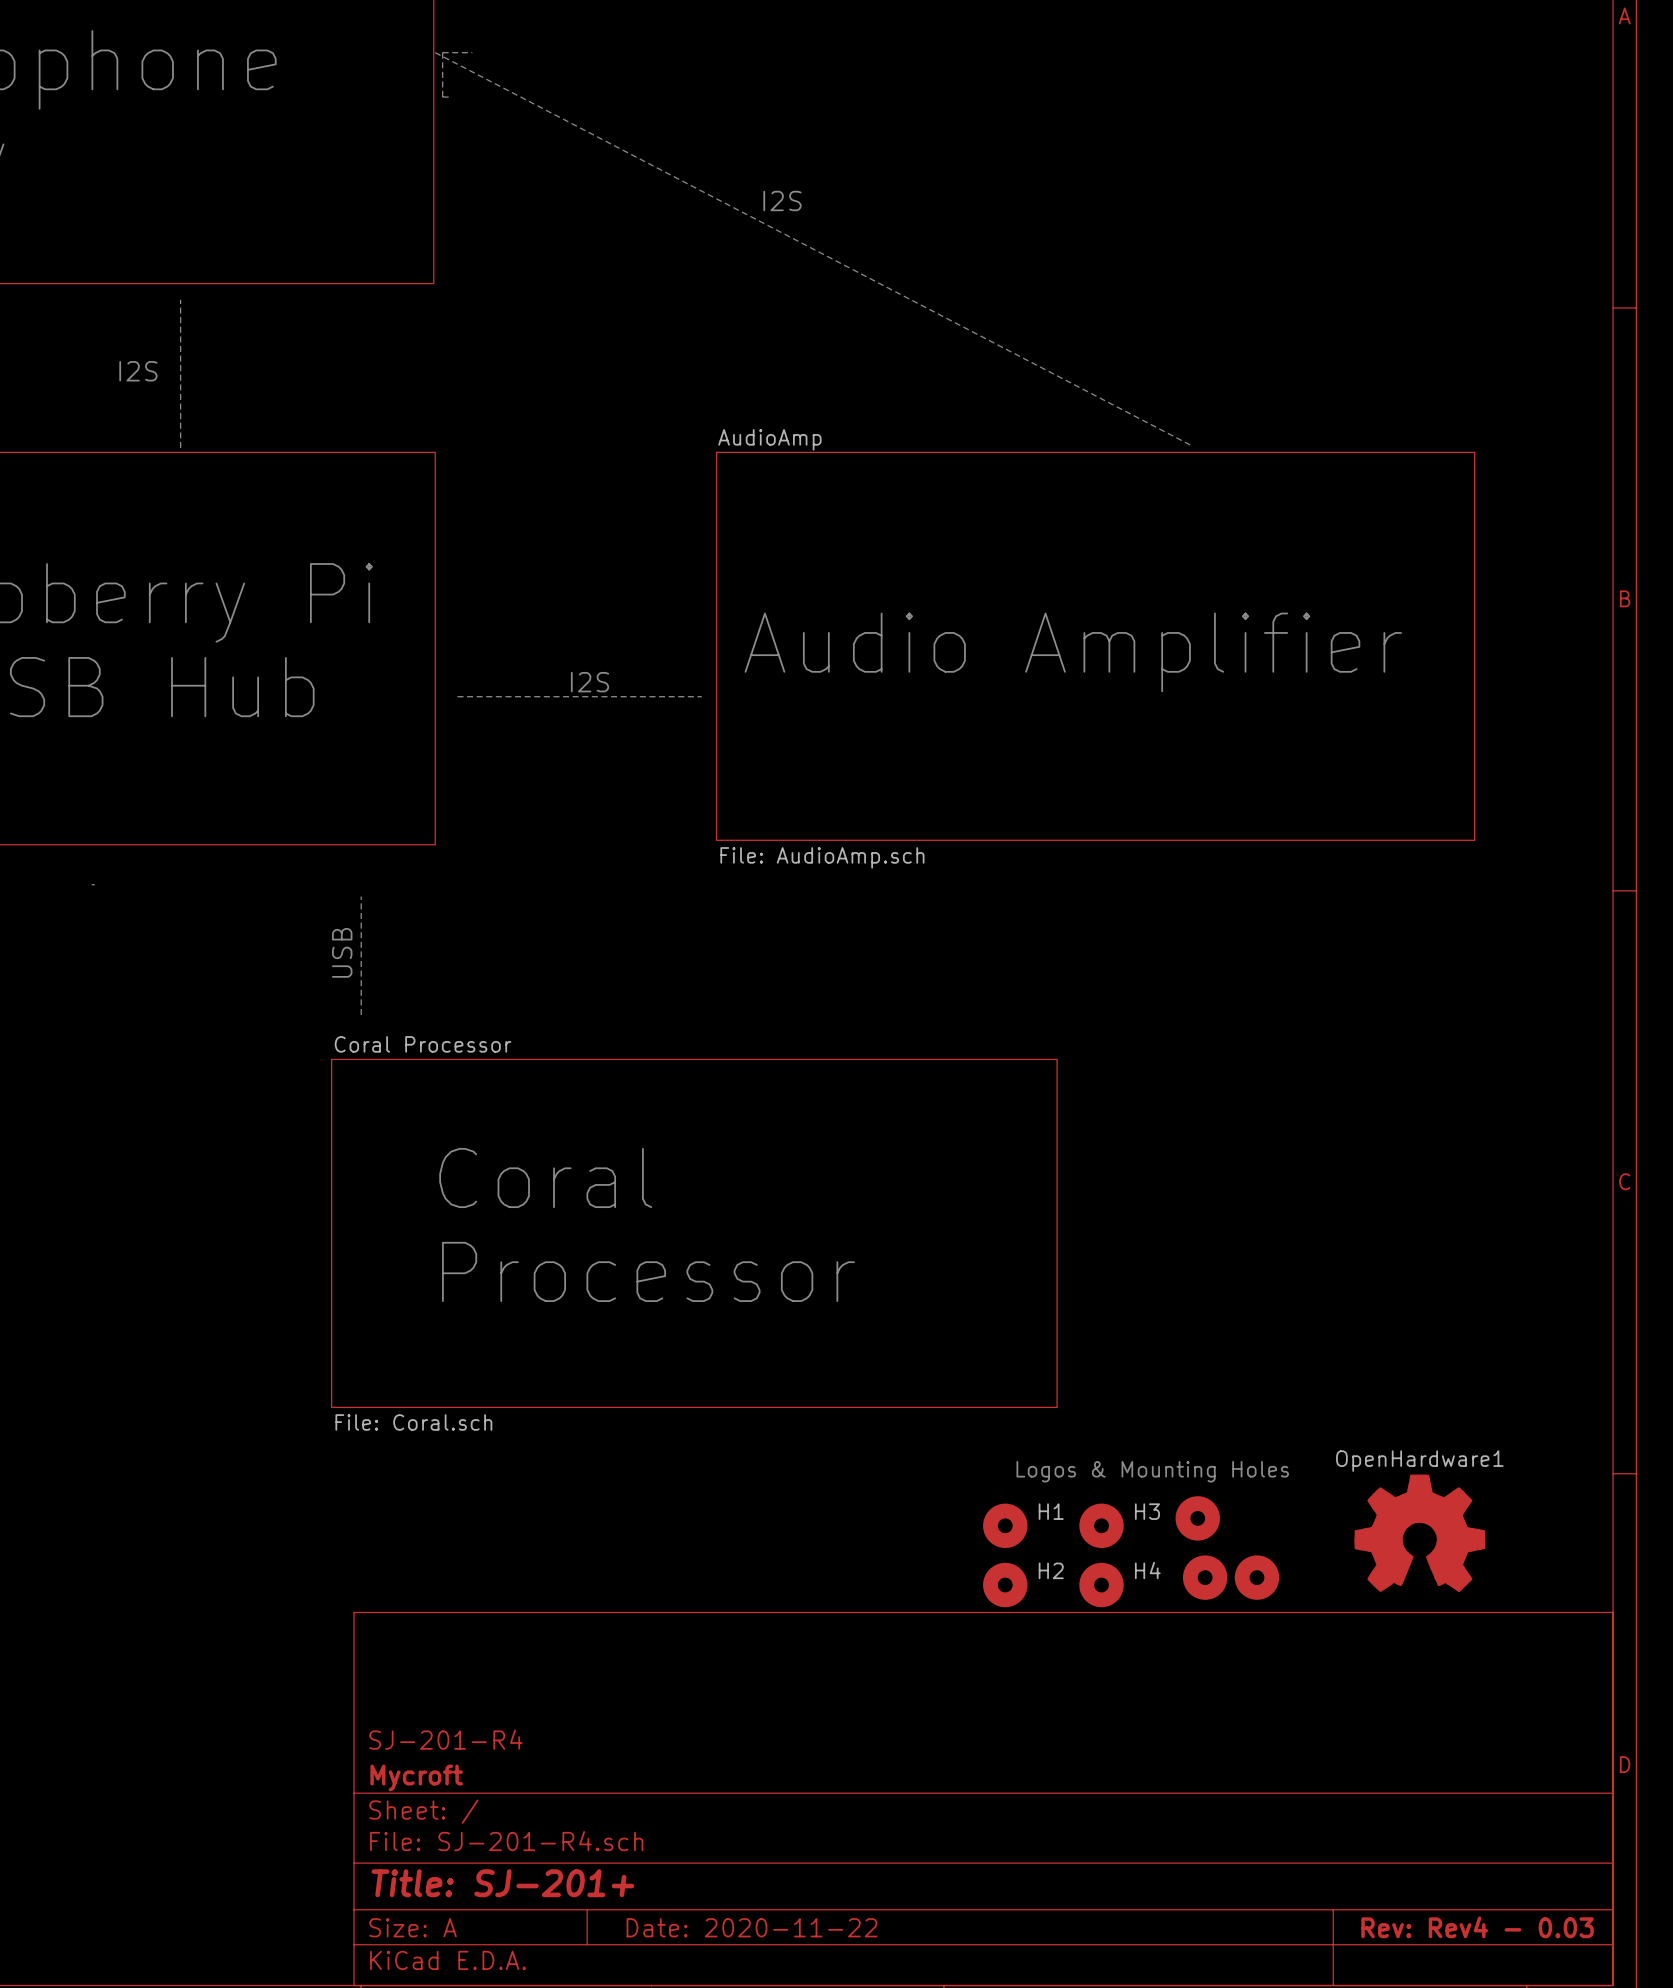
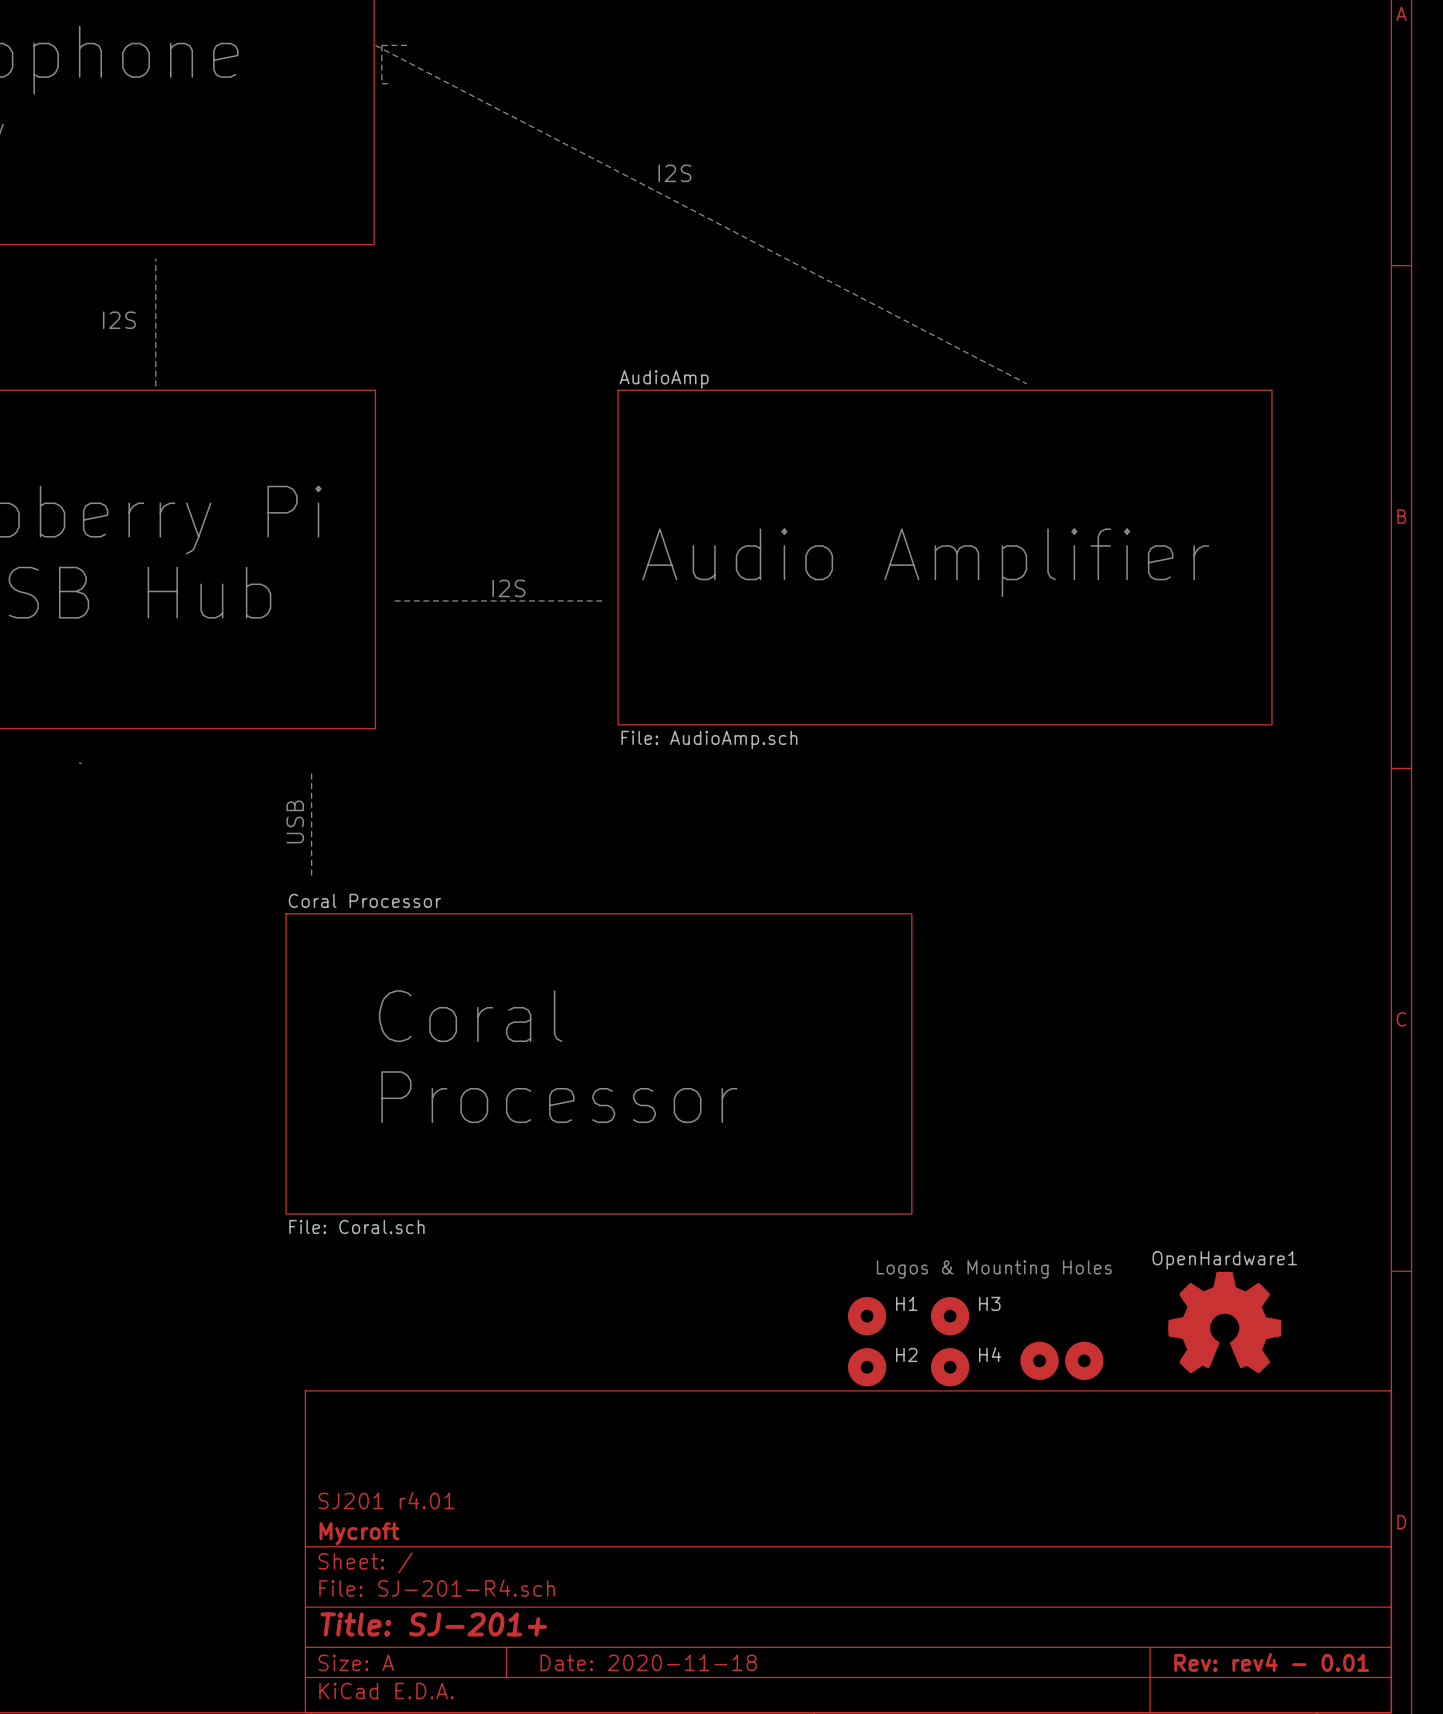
part: (1197, 1518) -> none
title block: SJ-201-R4 (445, 1739) -> SJ201 r4.01 (386, 1500)
title block: Date: 2020-11-22 (751, 1927) -> Date: 2020-11-18 (648, 1662)
title block: Rev: Rev4 - 0.03 (1477, 1927) -> Rev: rev4 - 0.01 (1271, 1662)

